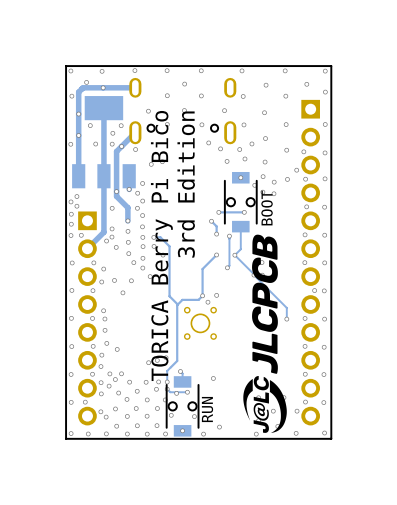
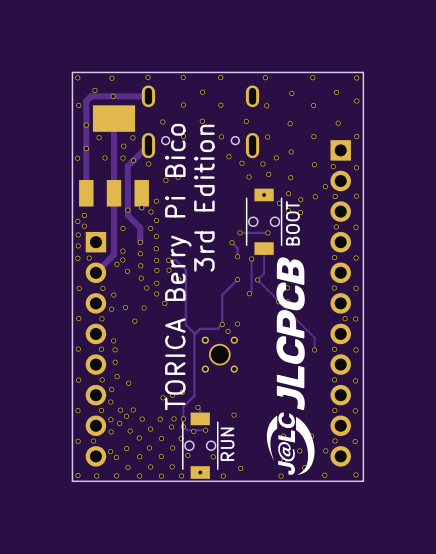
via: none -> (338, 123)
part: (310, 262) -> none
part: none -> (340, 303)

